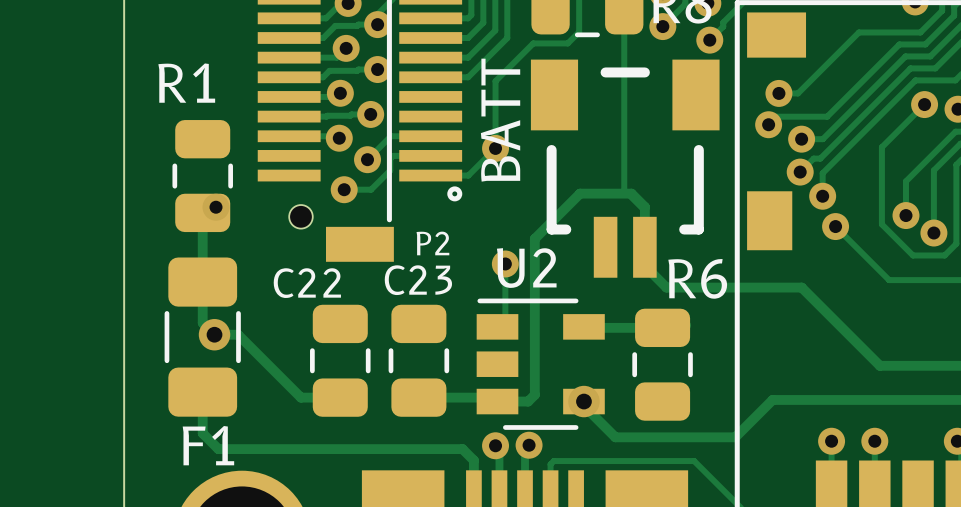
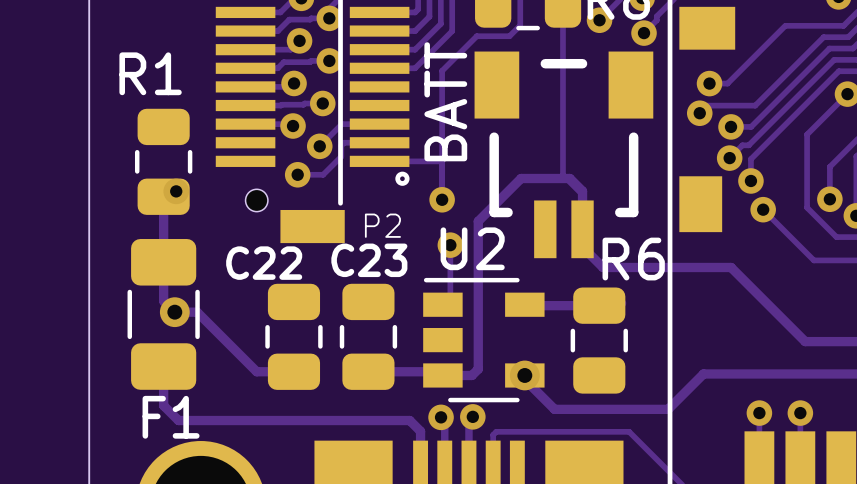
track: (496, 80) (495, 148) (468, 175) -> (442, 70) (442, 199)
via position: (495, 148) -> (442, 199)
track: none -> (442, 160) (415, 161)

